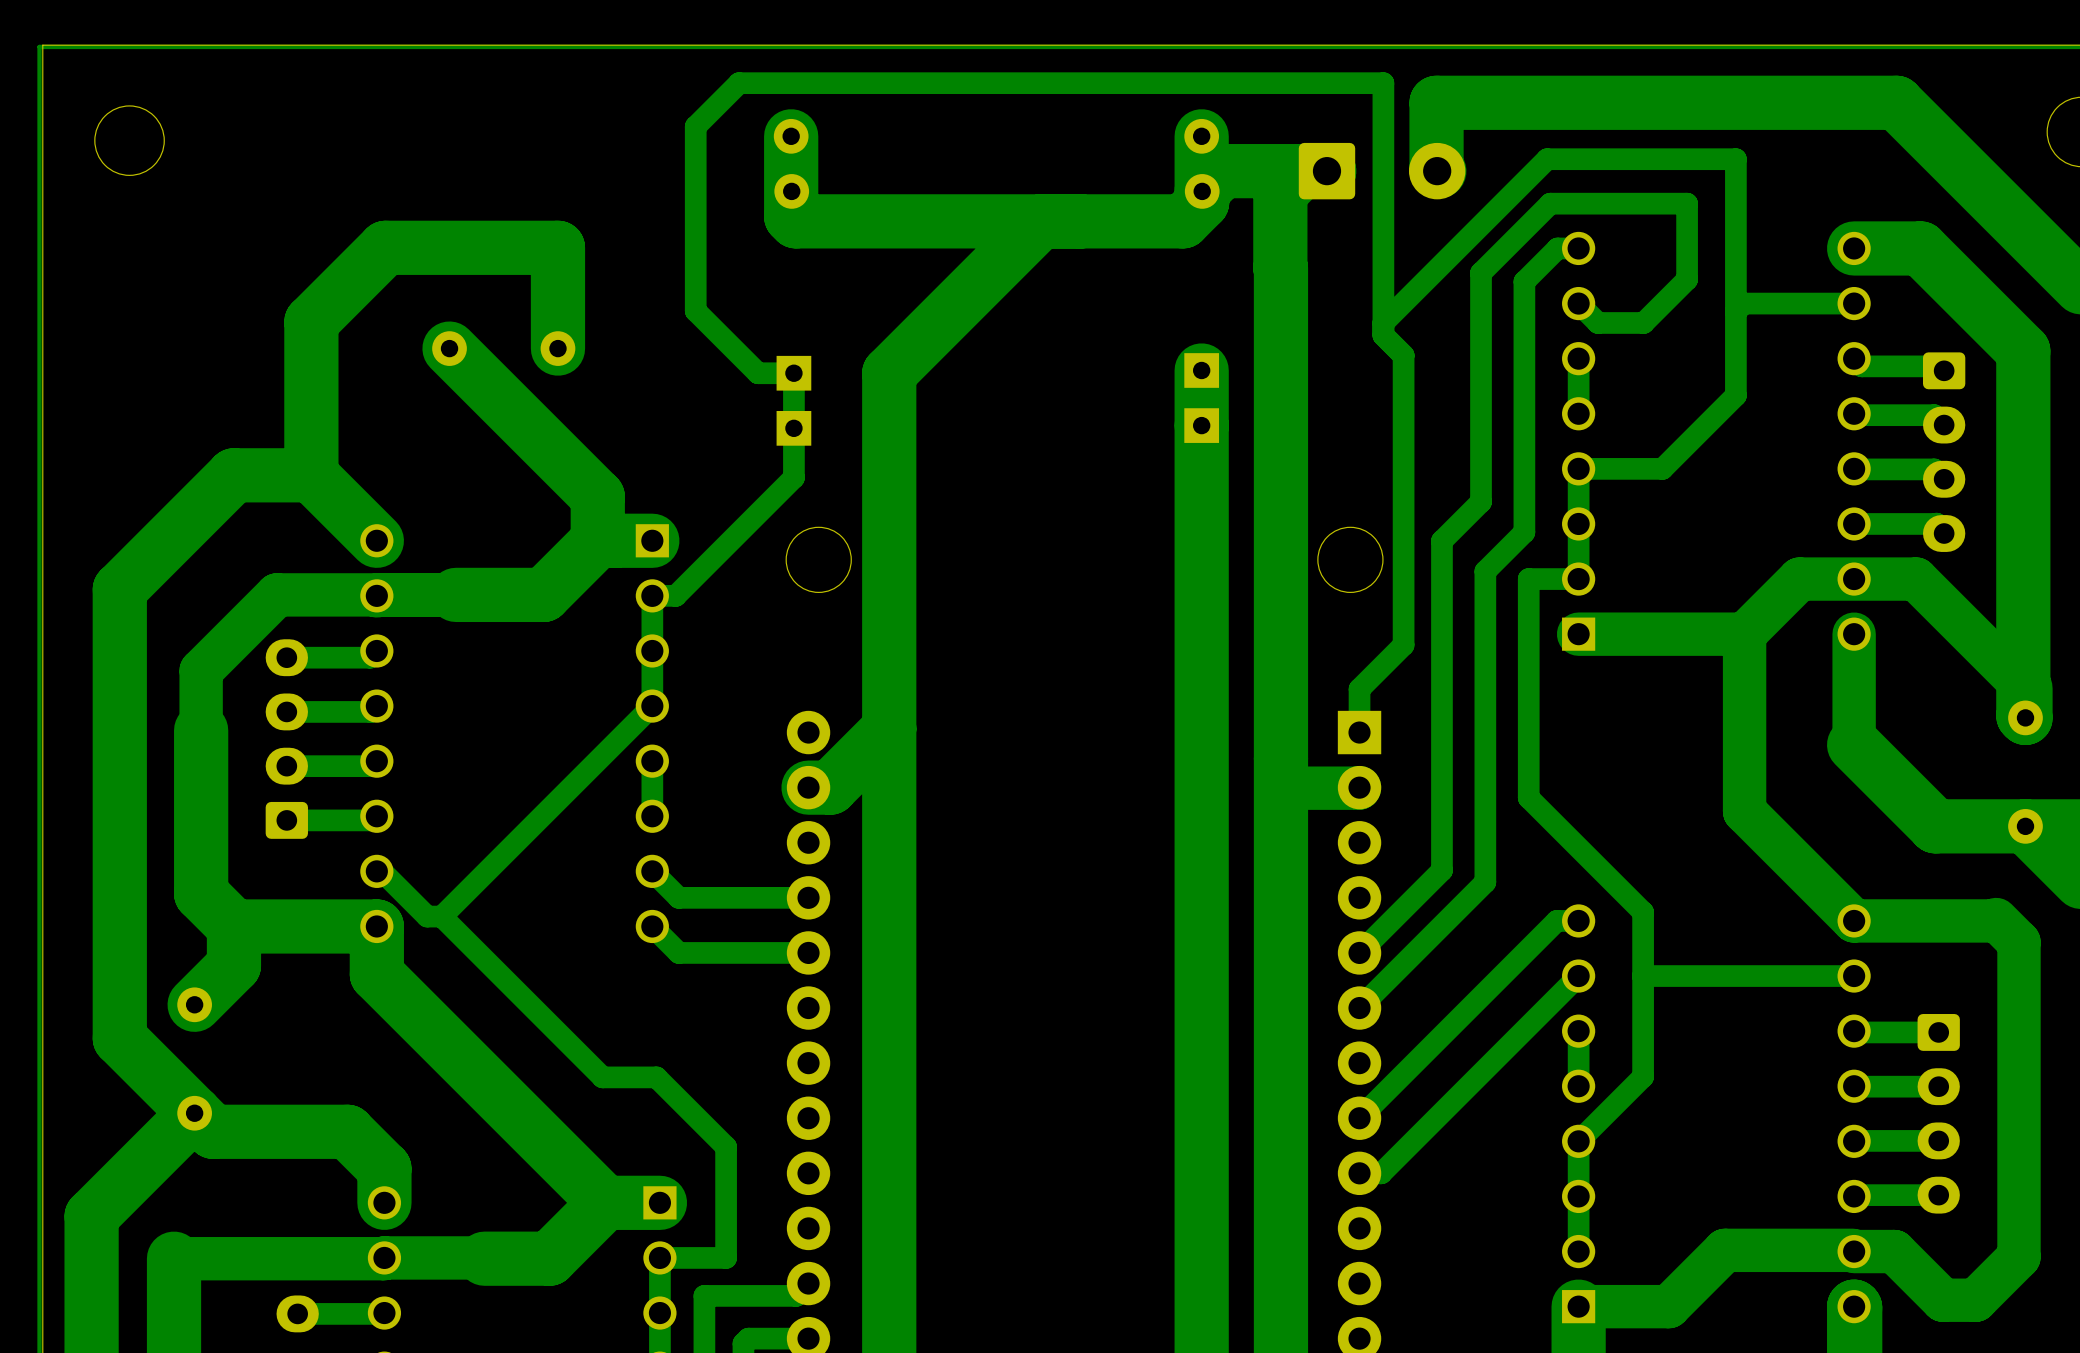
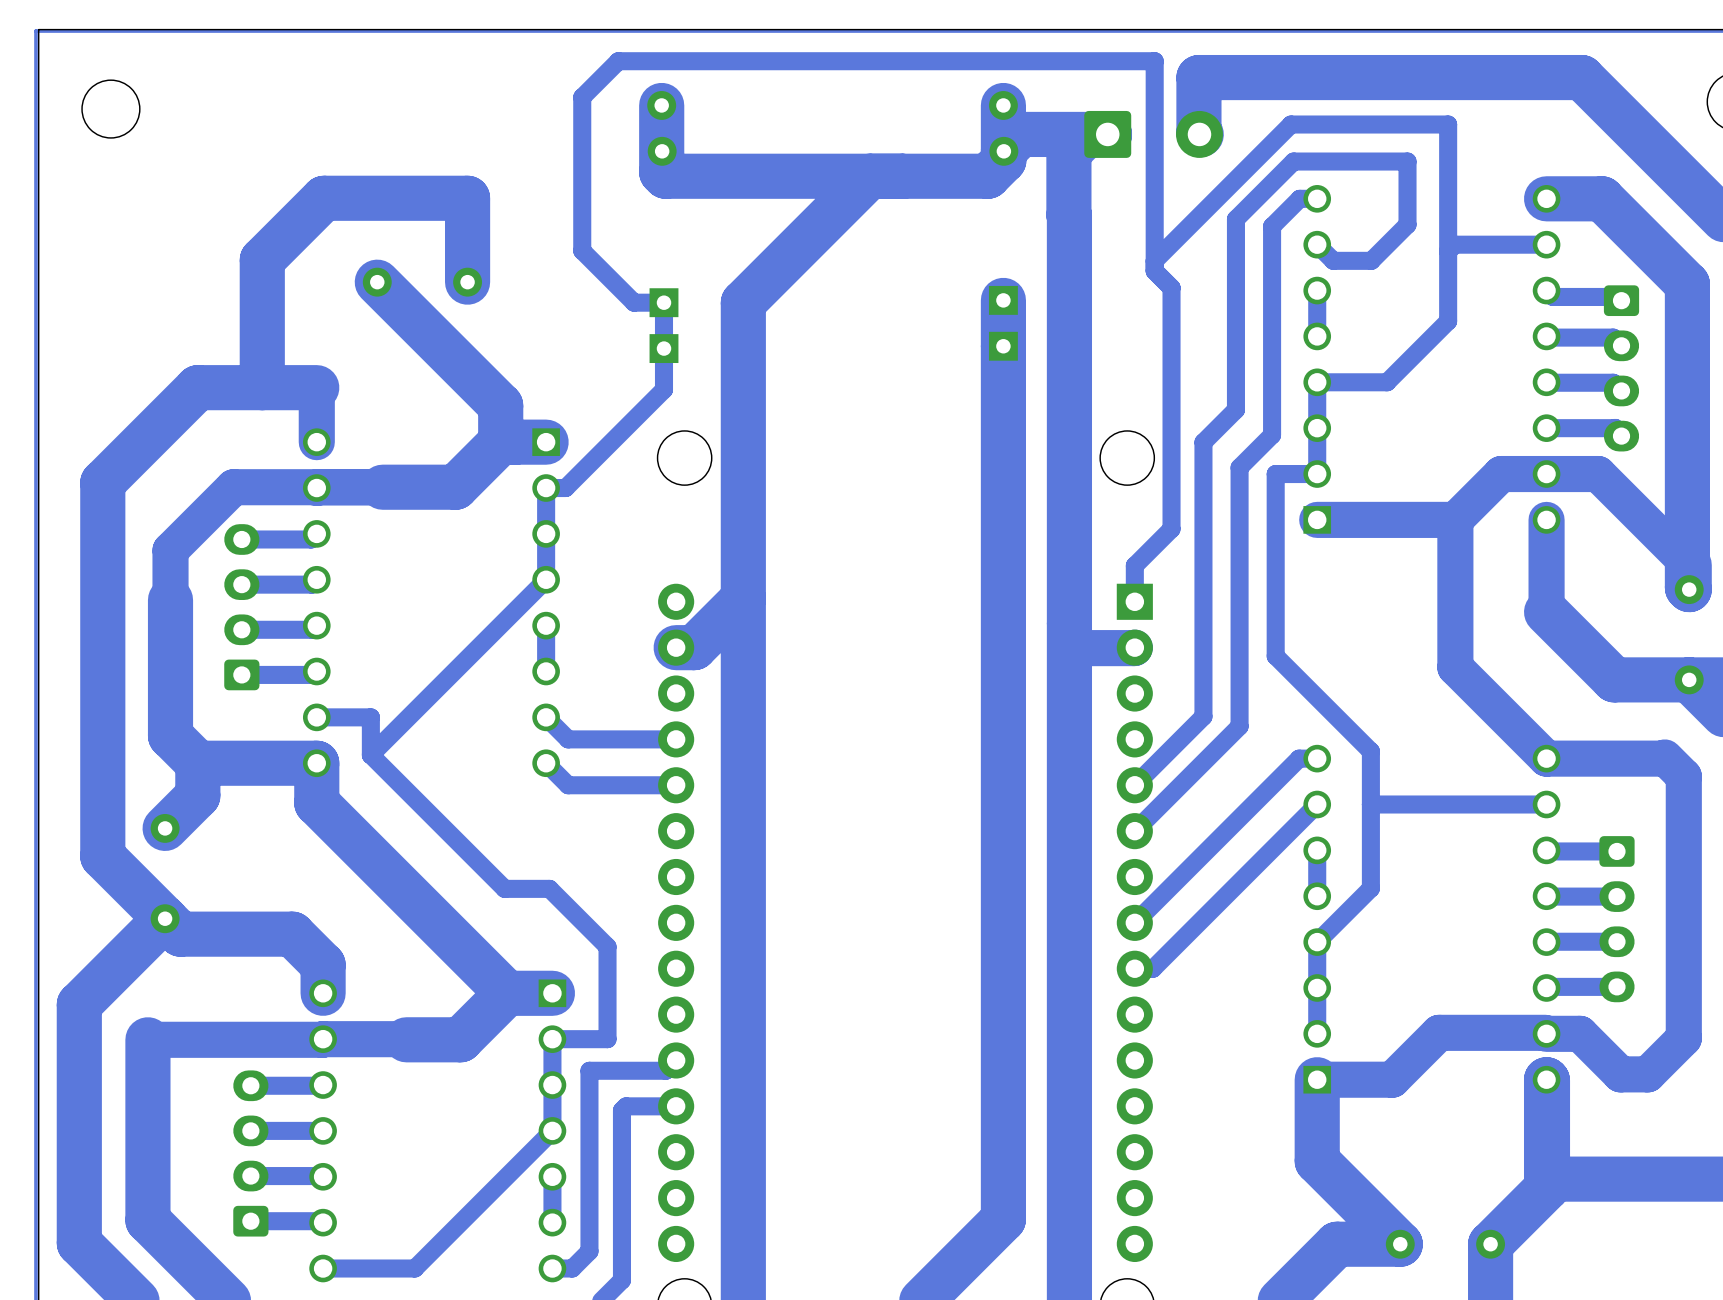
track: (311, 475) (376, 540) -> (262, 387) (316, 387) (316, 442)
track: (382, 871) (427, 916) (441, 916) -> (321, 717) (370, 717) (370, 754)

